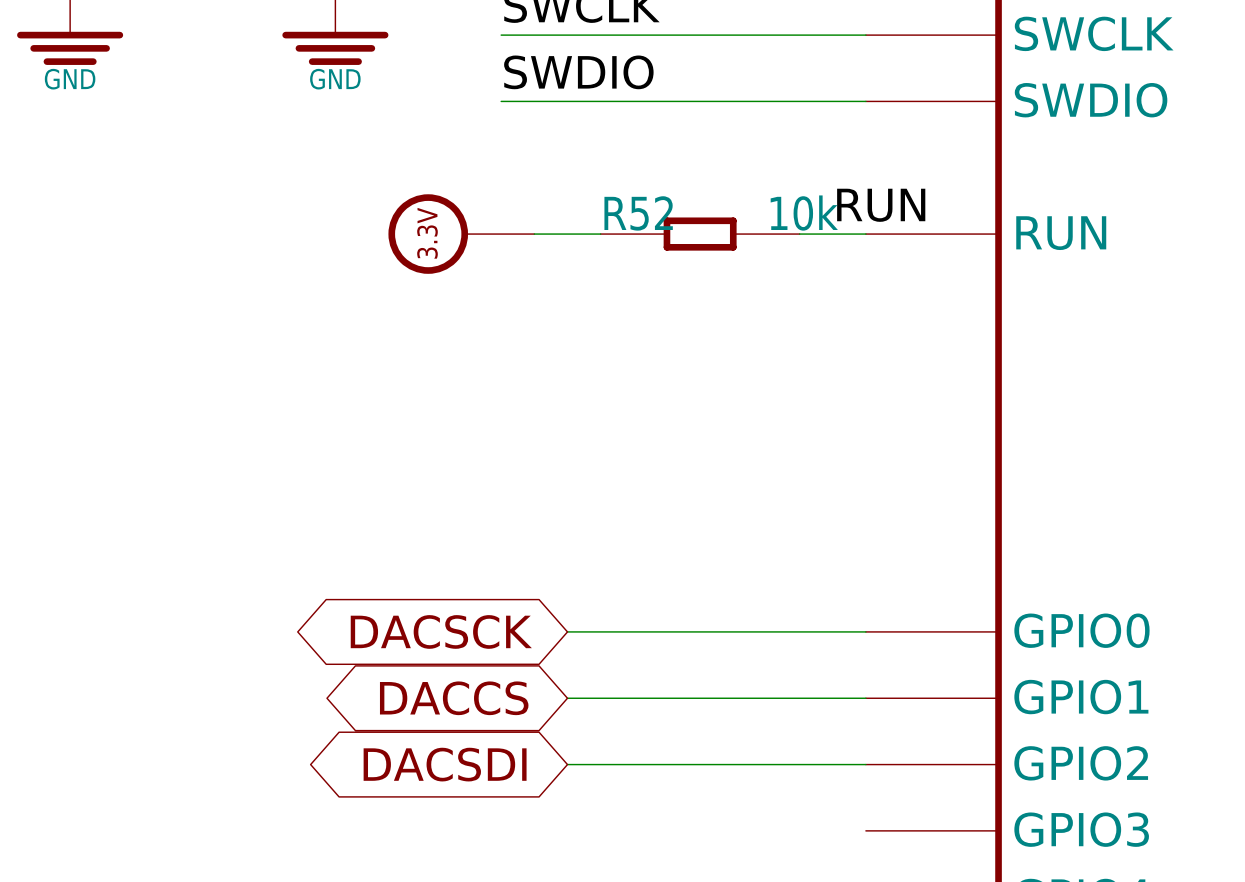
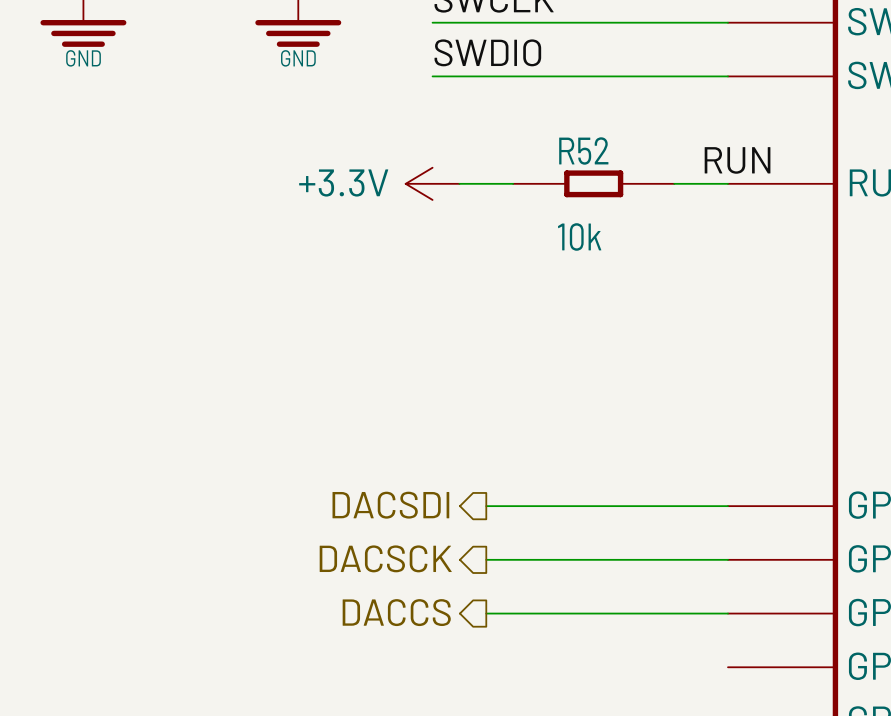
R52 name position: R52 (638, 213) -> R52 (583, 150)
R52 value position: 10k (804, 213) -> 10k (579, 236)
power symbol: (461, 234) -> none
power symbol: none -> +3.3V (432, 183)
hierarchical label: none -> DACSDI (390, 505)
global label: DACSCK (441, 631) -> none
hierarchical label: none -> DACSCK (385, 558)
global label: DACCS (454, 698) -> none
hierarchical label: none -> DACCS (396, 612)
global label: DACSDI (445, 764) -> none

